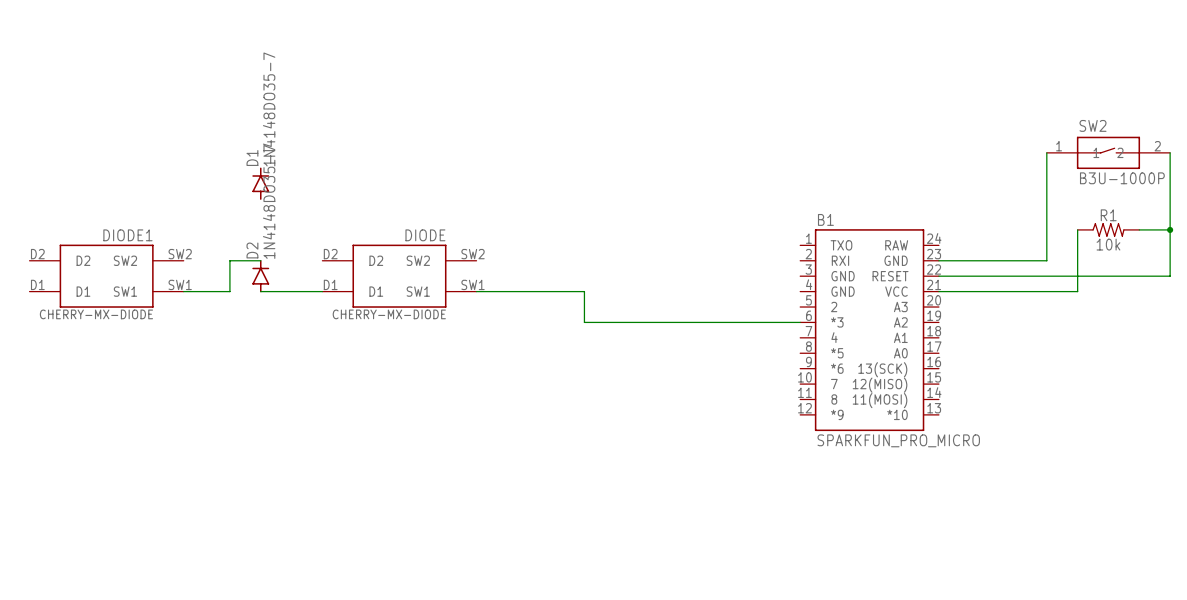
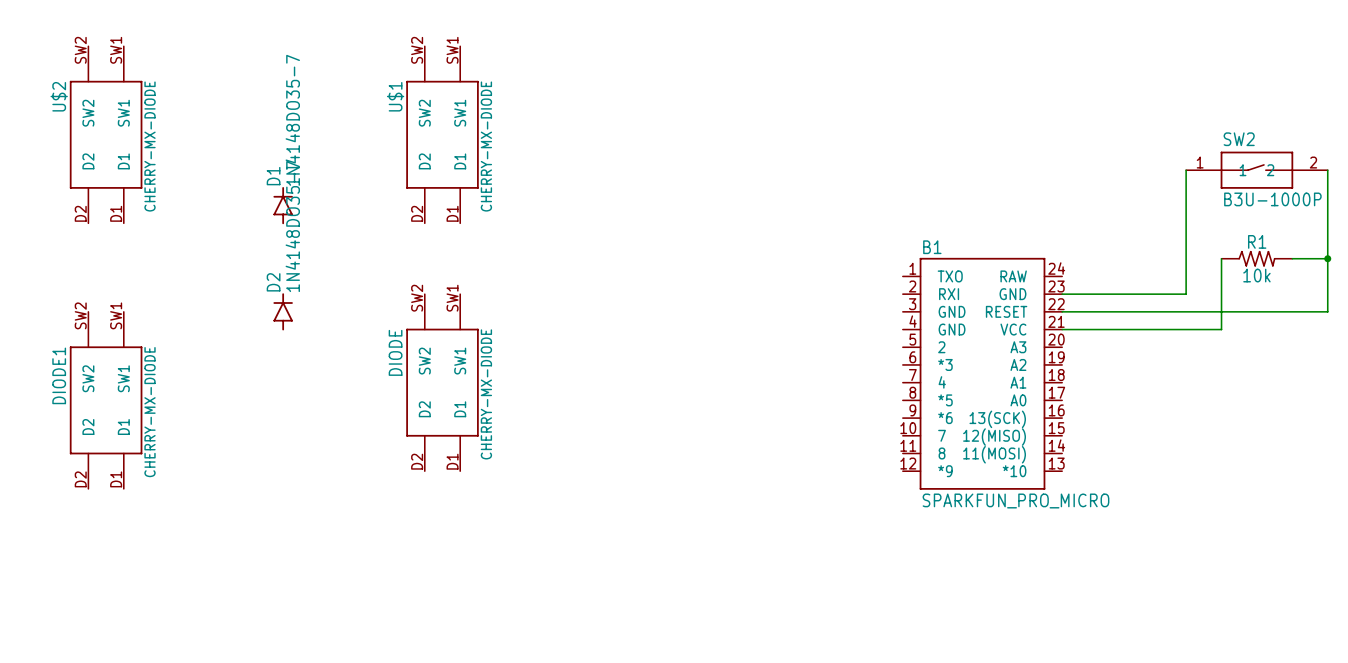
U$2: none -> (106, 134)
U$1: none -> (442, 134)
wire: (260, 260) (229, 260) (229, 291) (183, 291) -> none
DIODE1 rotation: 0° (106, 276) -> 90° counterclockwise (106, 400)
DIODE rotation: 0° (399, 276) -> 90° counterclockwise (442, 382)
wire: (260, 291) (322, 291) -> none
wire: (476, 291) (584, 291) (584, 322) (800, 322) -> none

